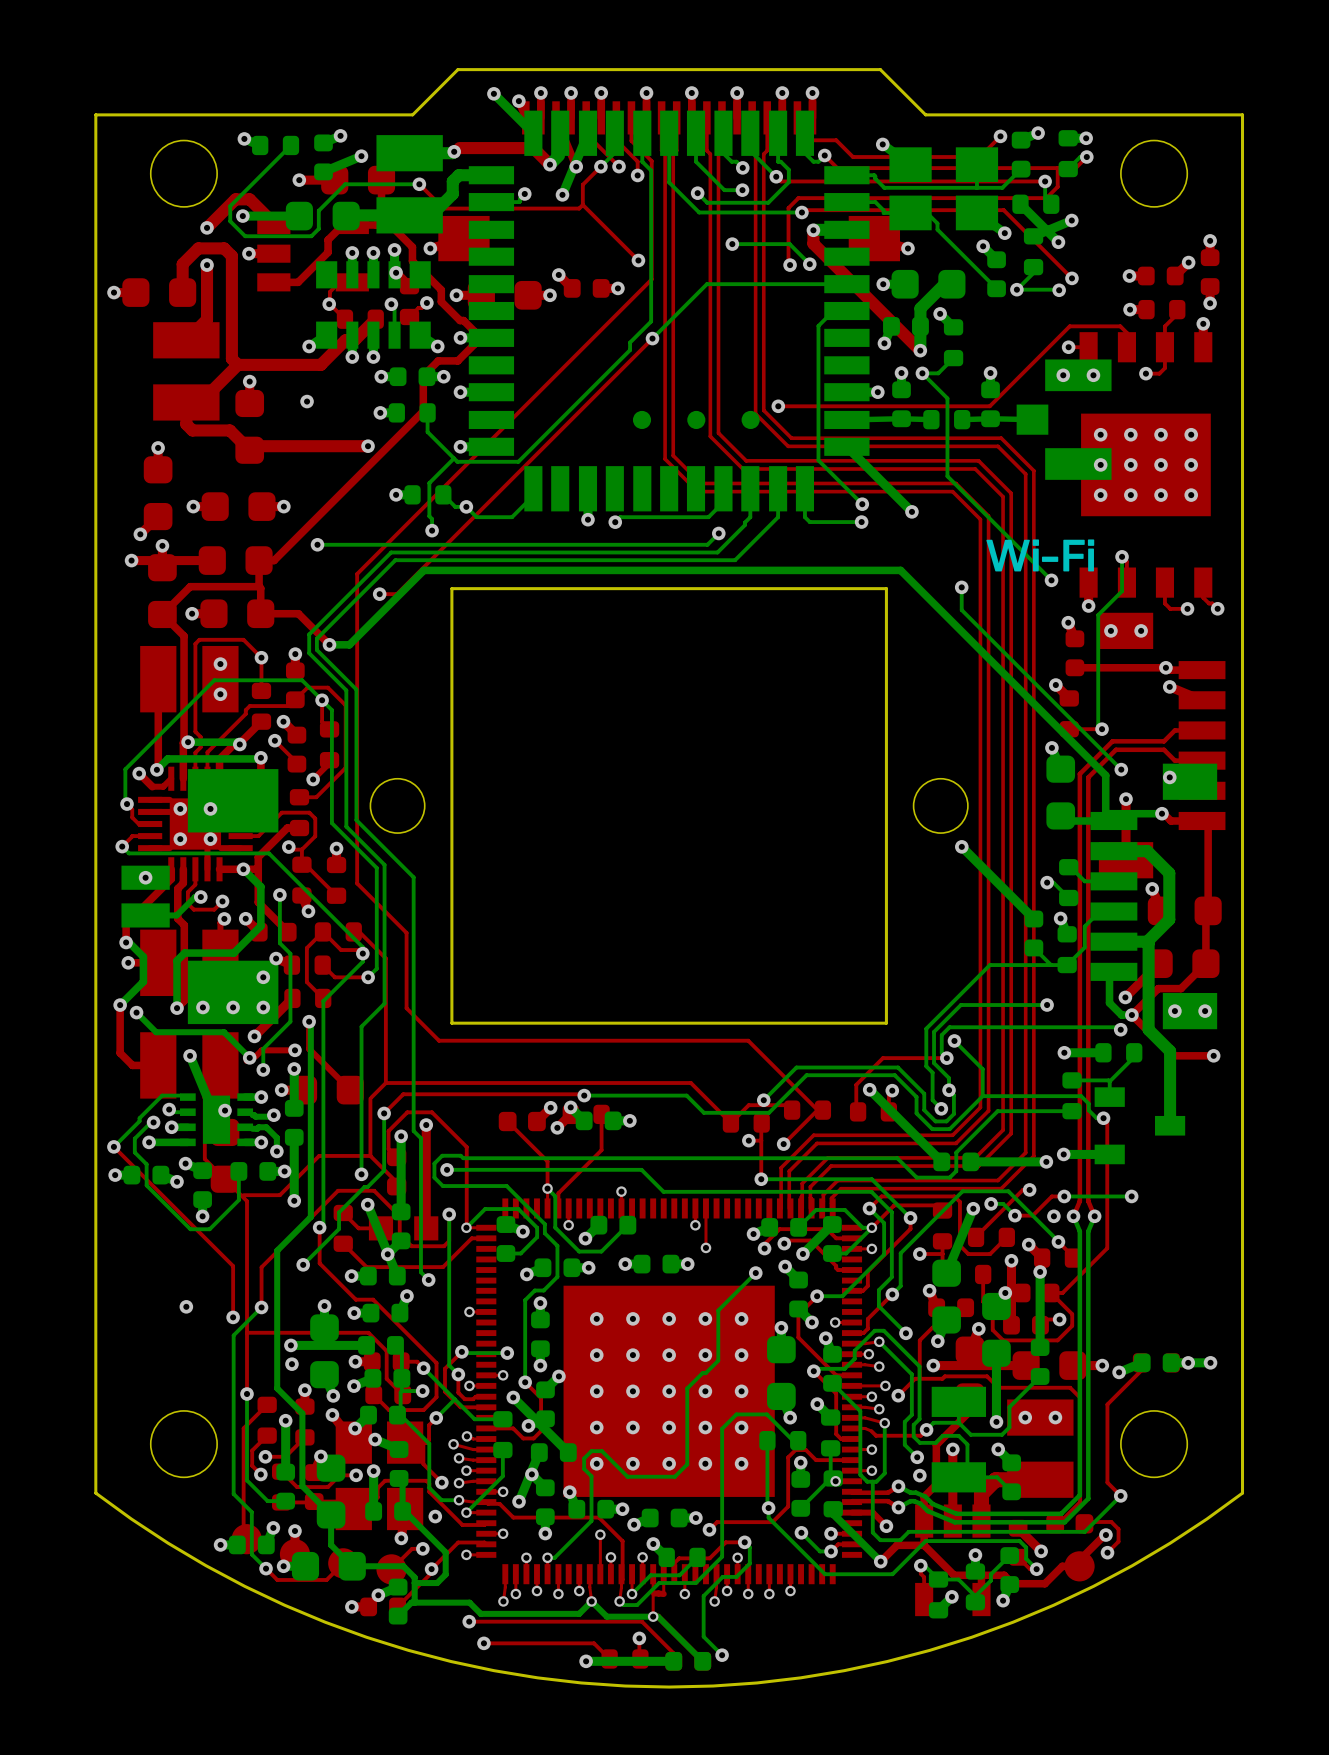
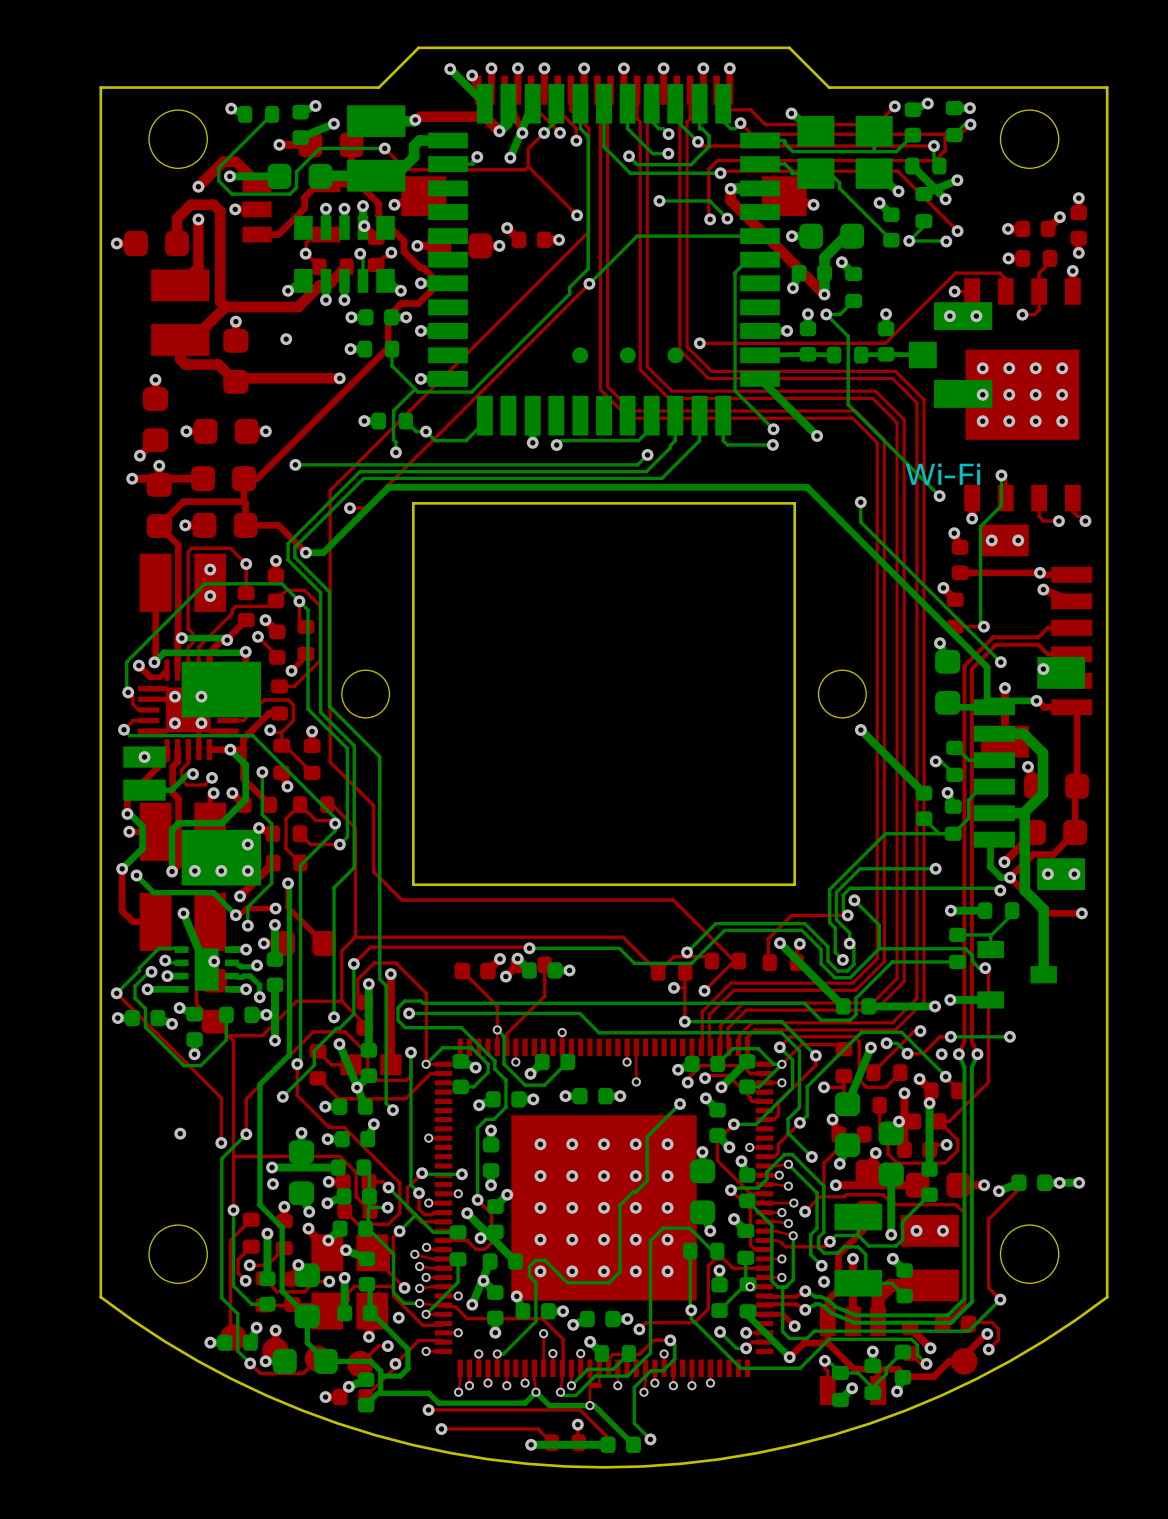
drawing: [986, 539, 1094, 572] -> none
drawing shape: [1087, 539, 1095, 546] -> [976, 463, 981, 467]
drawing: none -> [905, 463, 981, 485]
drawing shape: [1041, 556, 1059, 562] -> [938, 469, 942, 485]

